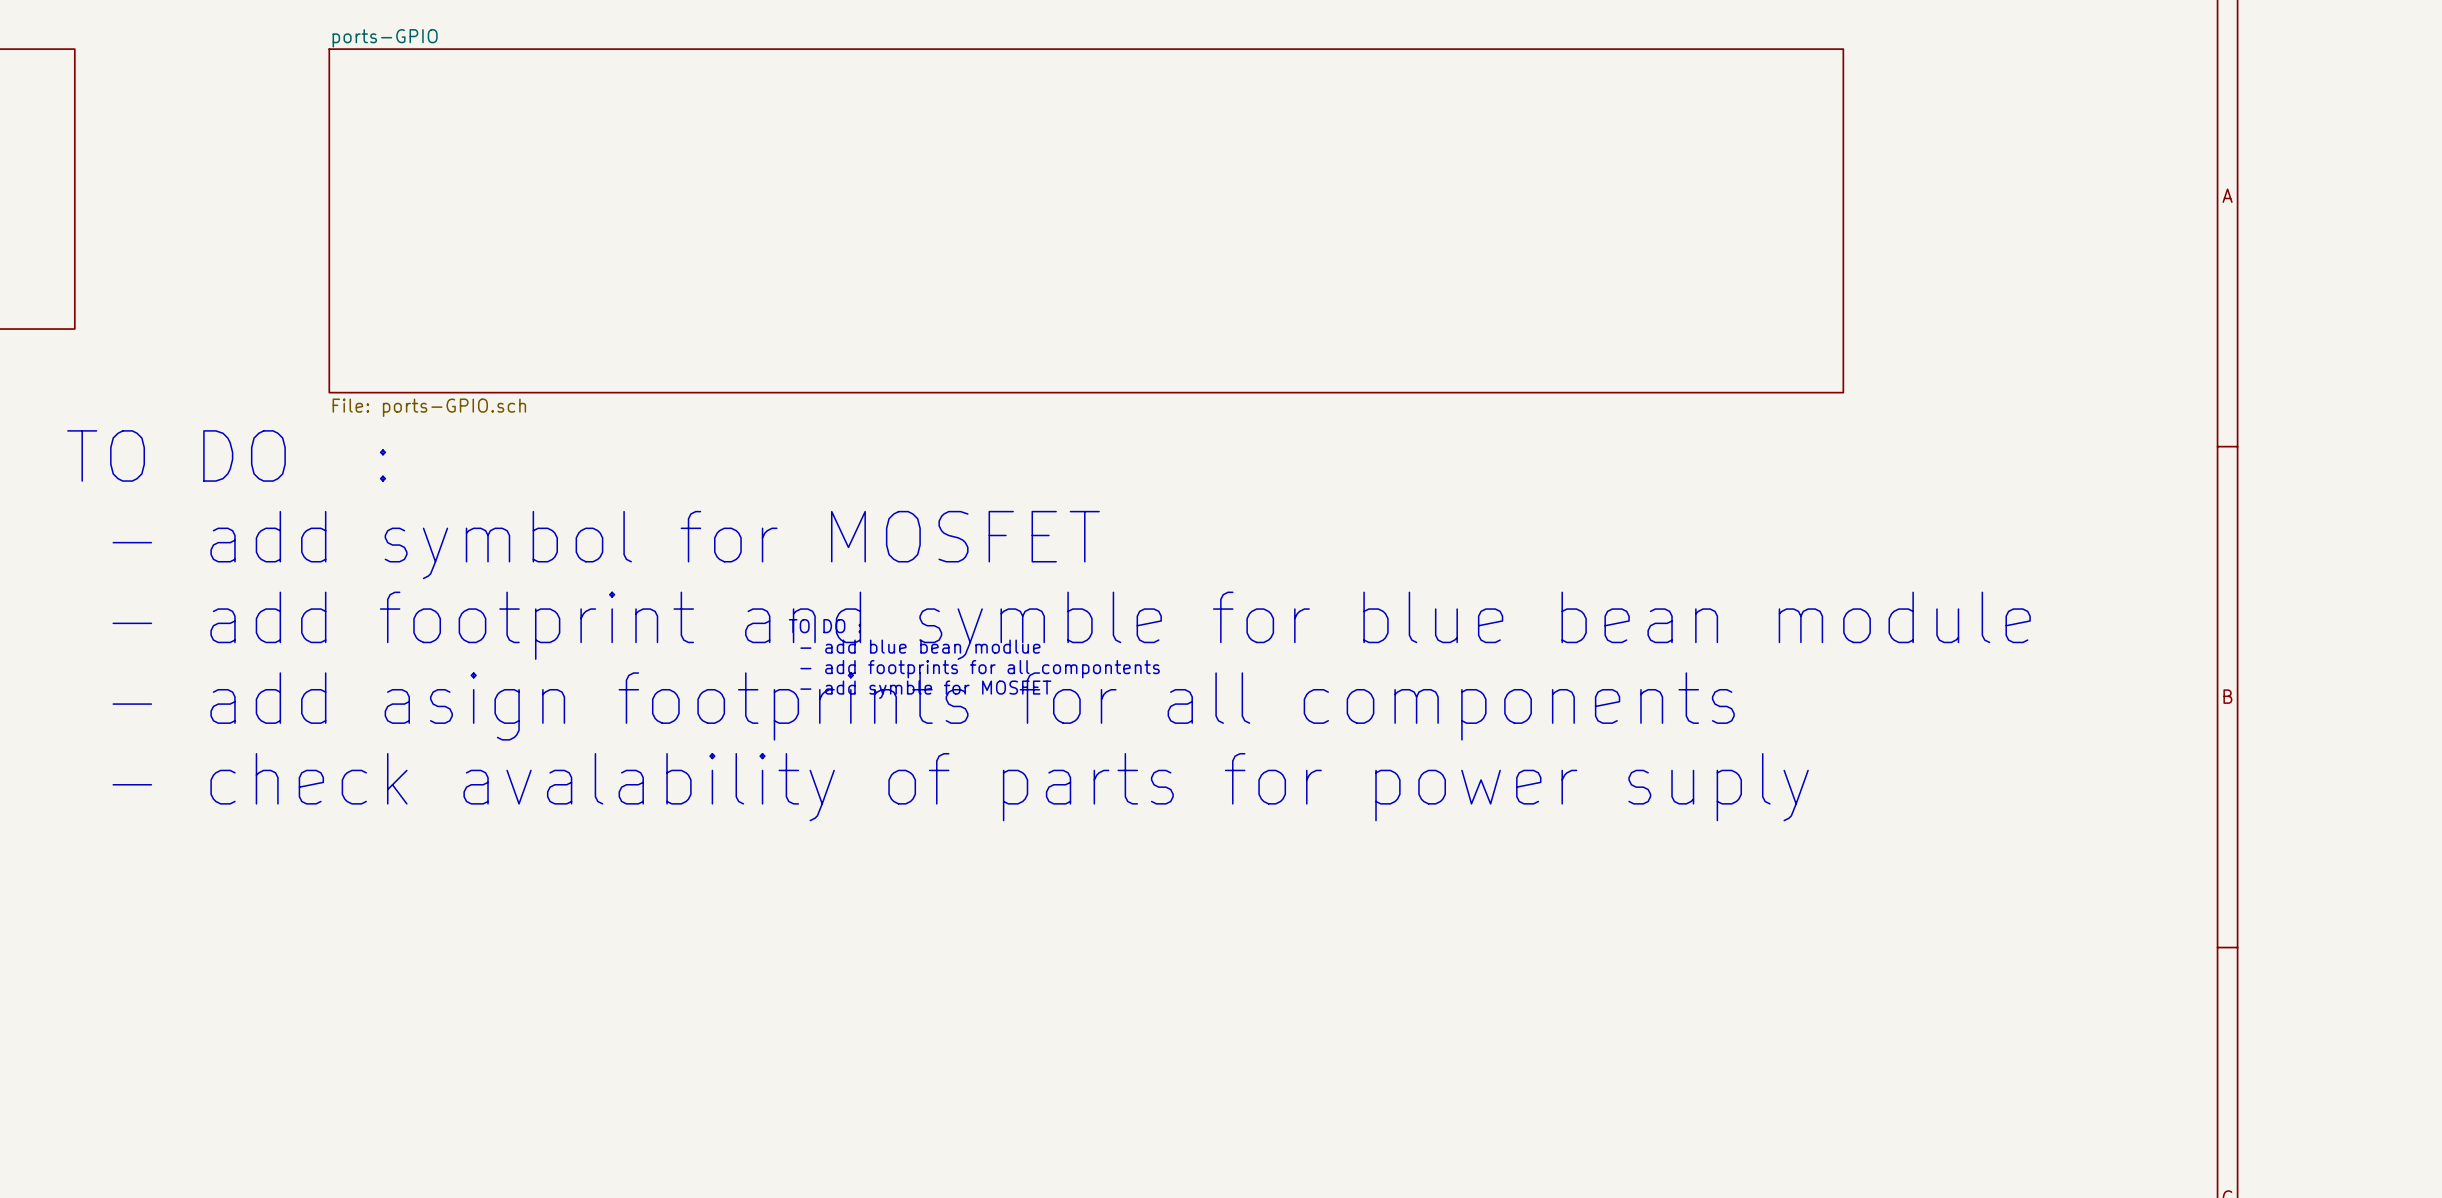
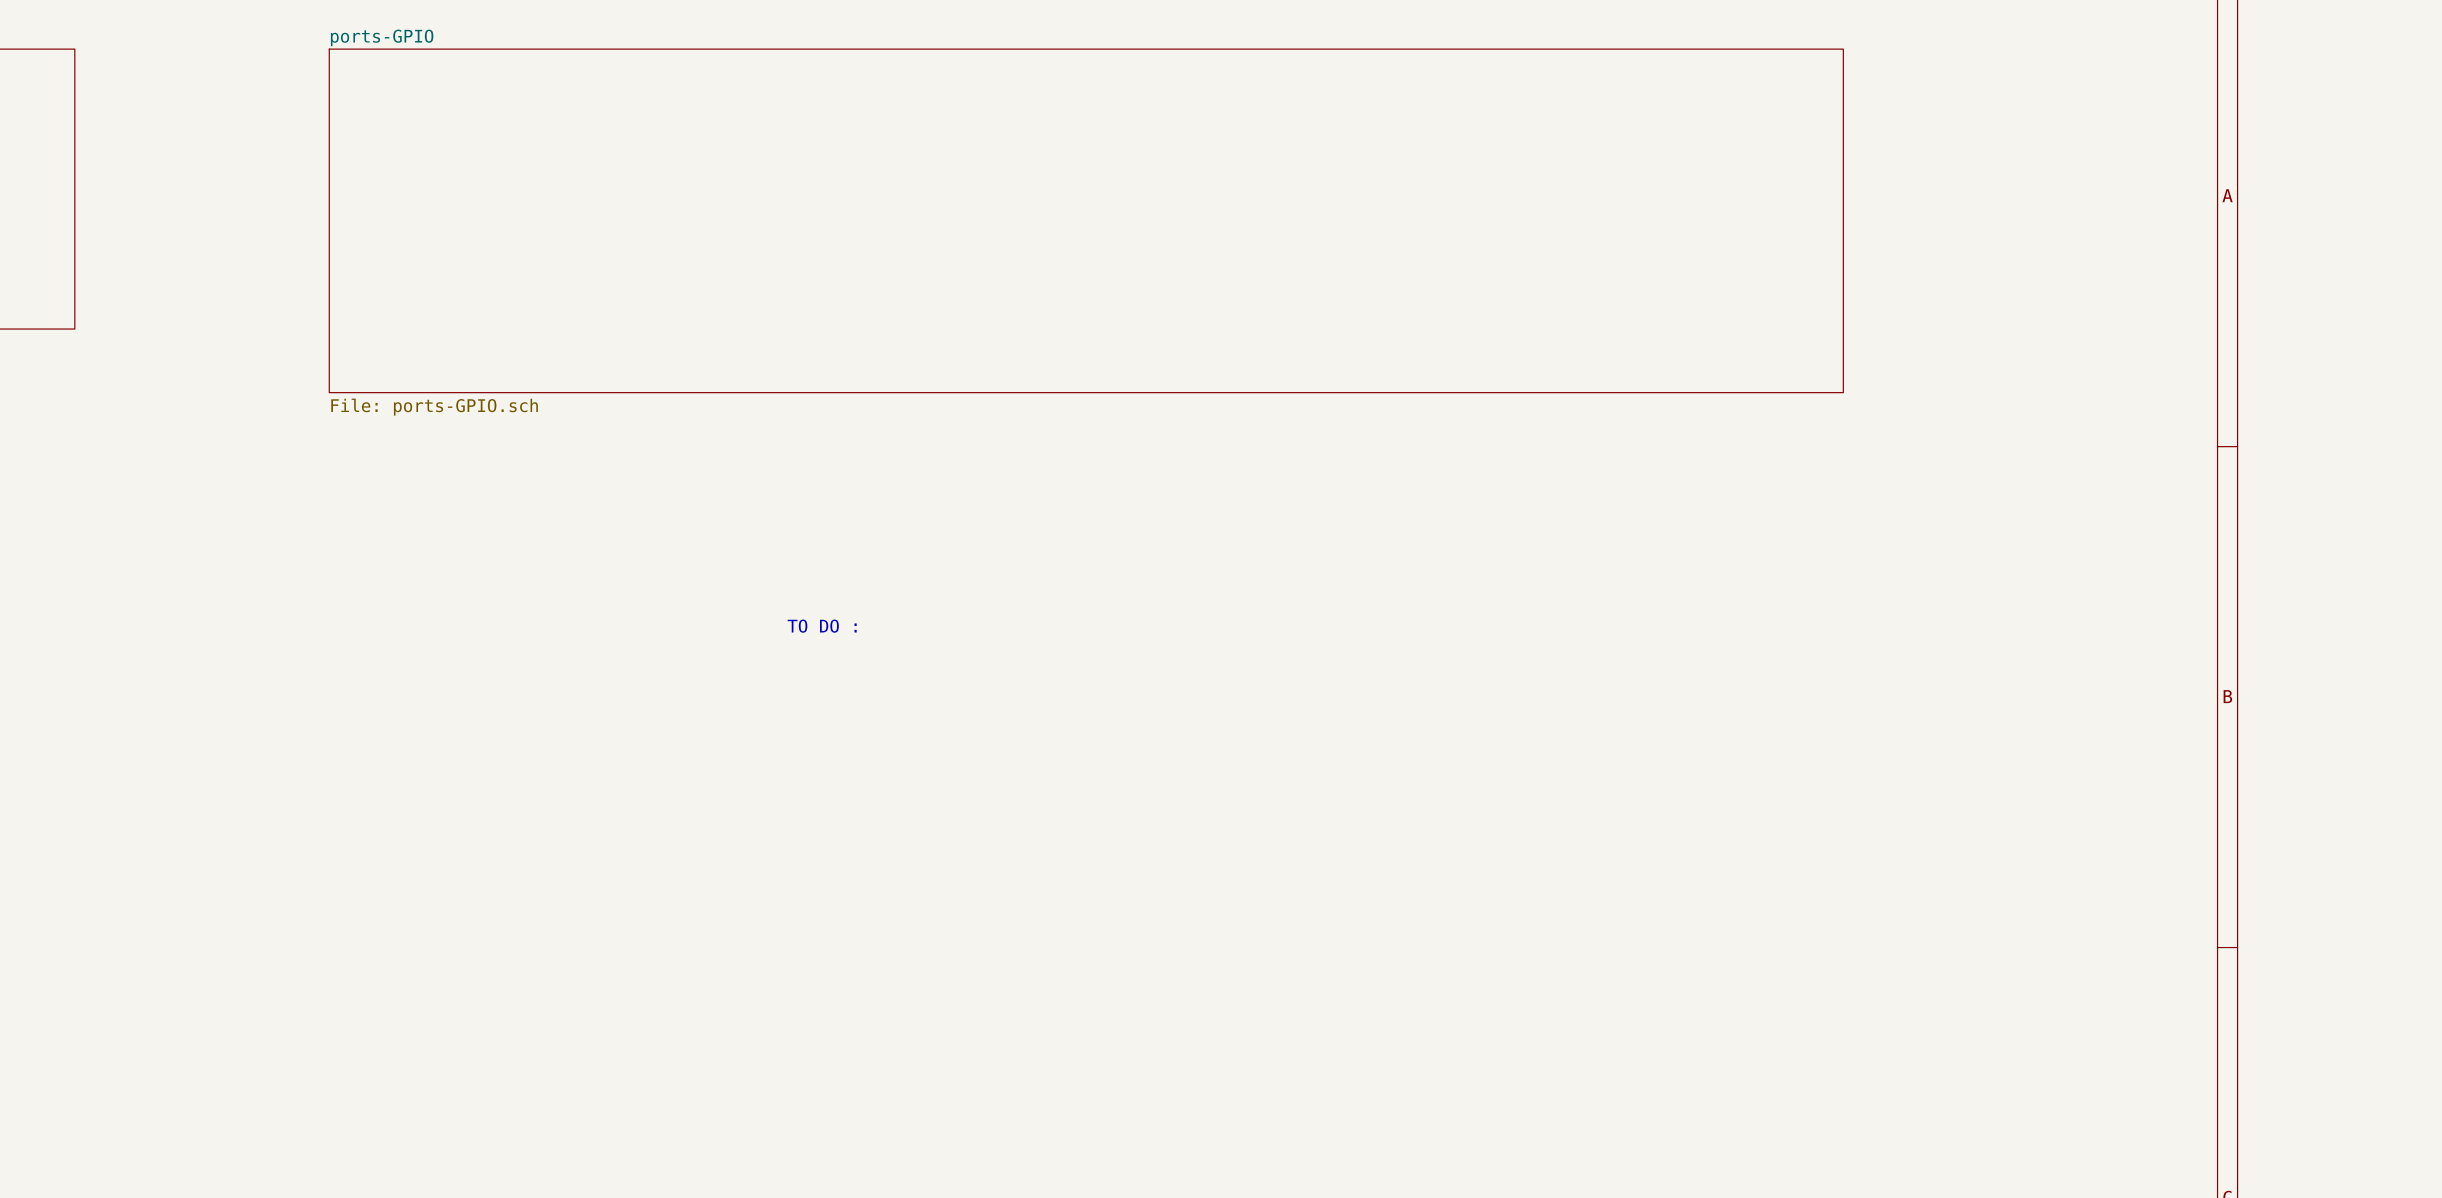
text: TO DO : (226, 455) -> none
text: - add symbol for MOSFET (606, 545) -> none
text: - add footprint and symble for blue bean module (1071, 625) -> none
text: - add blue bean modlue (920, 646) -> none
text: - add footprints for all compontents (980, 669) -> none
text: - add symble for MOSFET (925, 689) -> none
text: - add asign footprints for all components (923, 706) -> none
text: - check avalability of parts for power suply (960, 787) -> none

